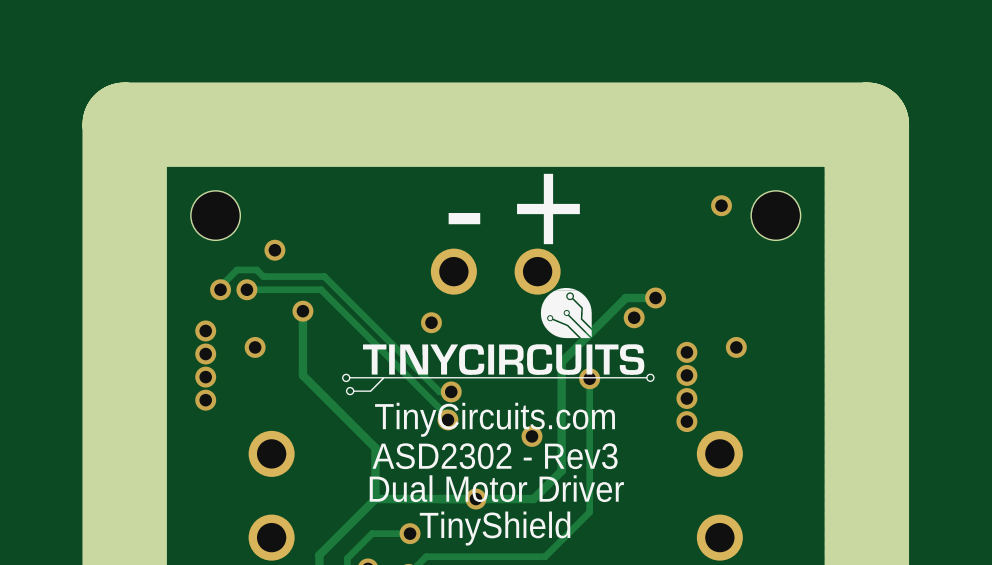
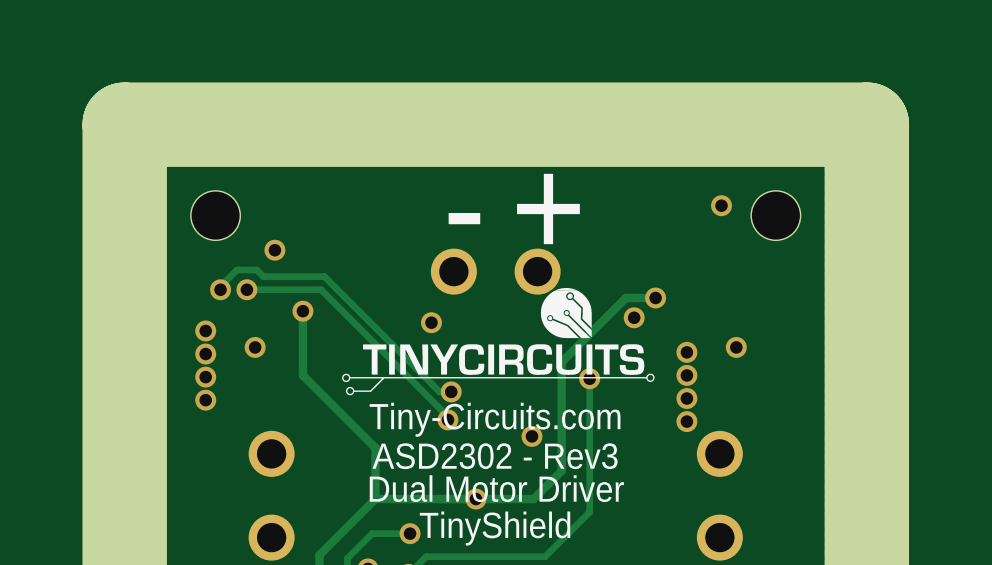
text: TinyCircuits.com (495, 419) -> Tiny-Circuits.com (495, 419)

